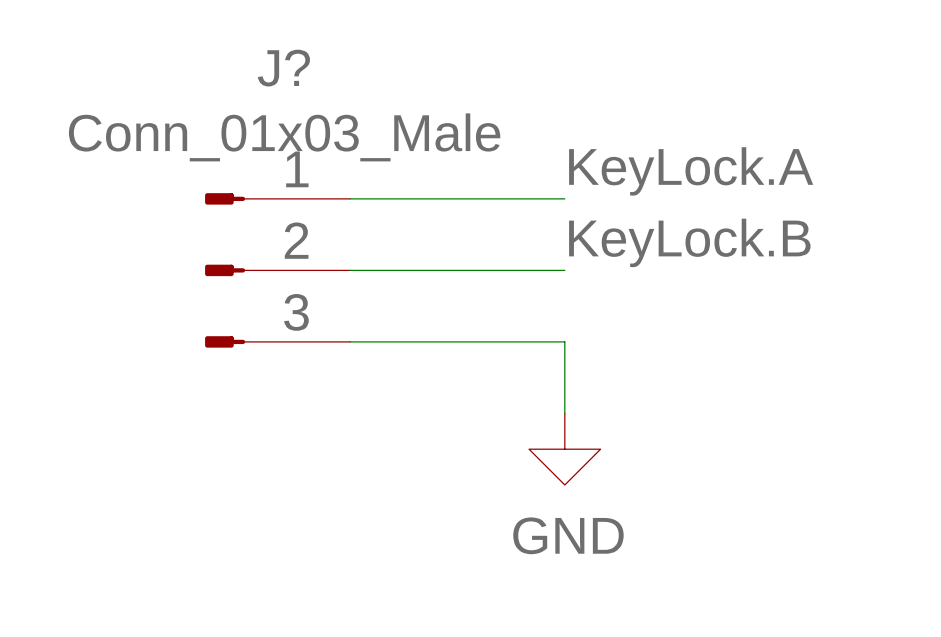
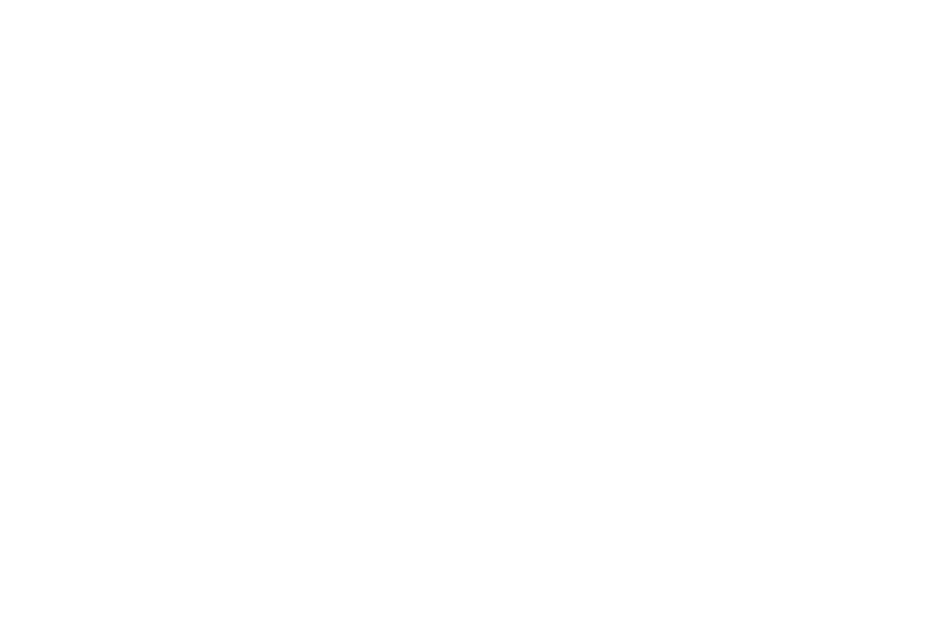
label: KeyLock.A (691, 171) -> none
wire: (350, 198) (564, 198) -> none
label: KeyLock.B (689, 242) -> none
J?: Conn_01x03_Male (277, 270) -> none
wire: (350, 270) (564, 270) -> none
wire: (350, 341) (564, 341) (564, 413) -> none
power symbol: GND (564, 449) -> none

